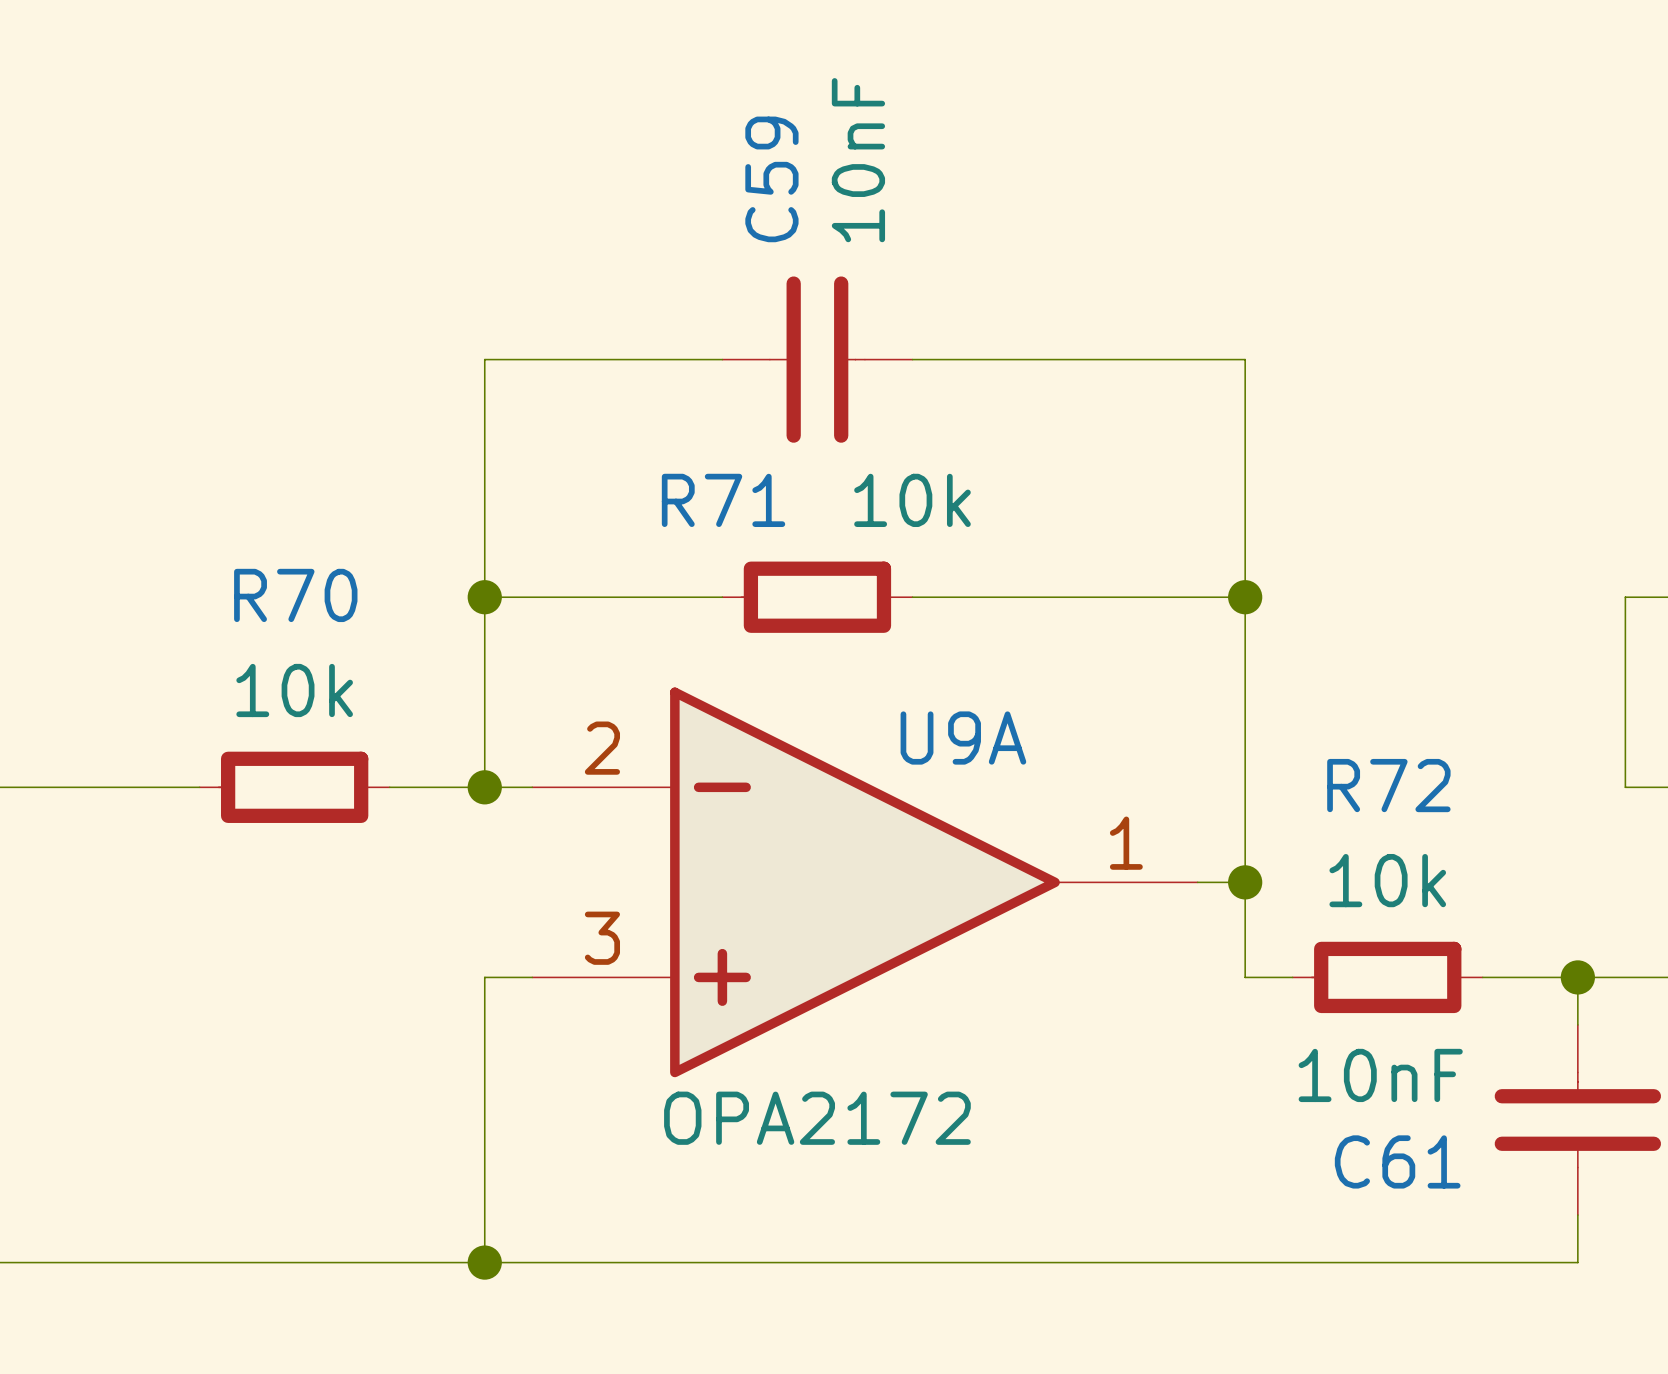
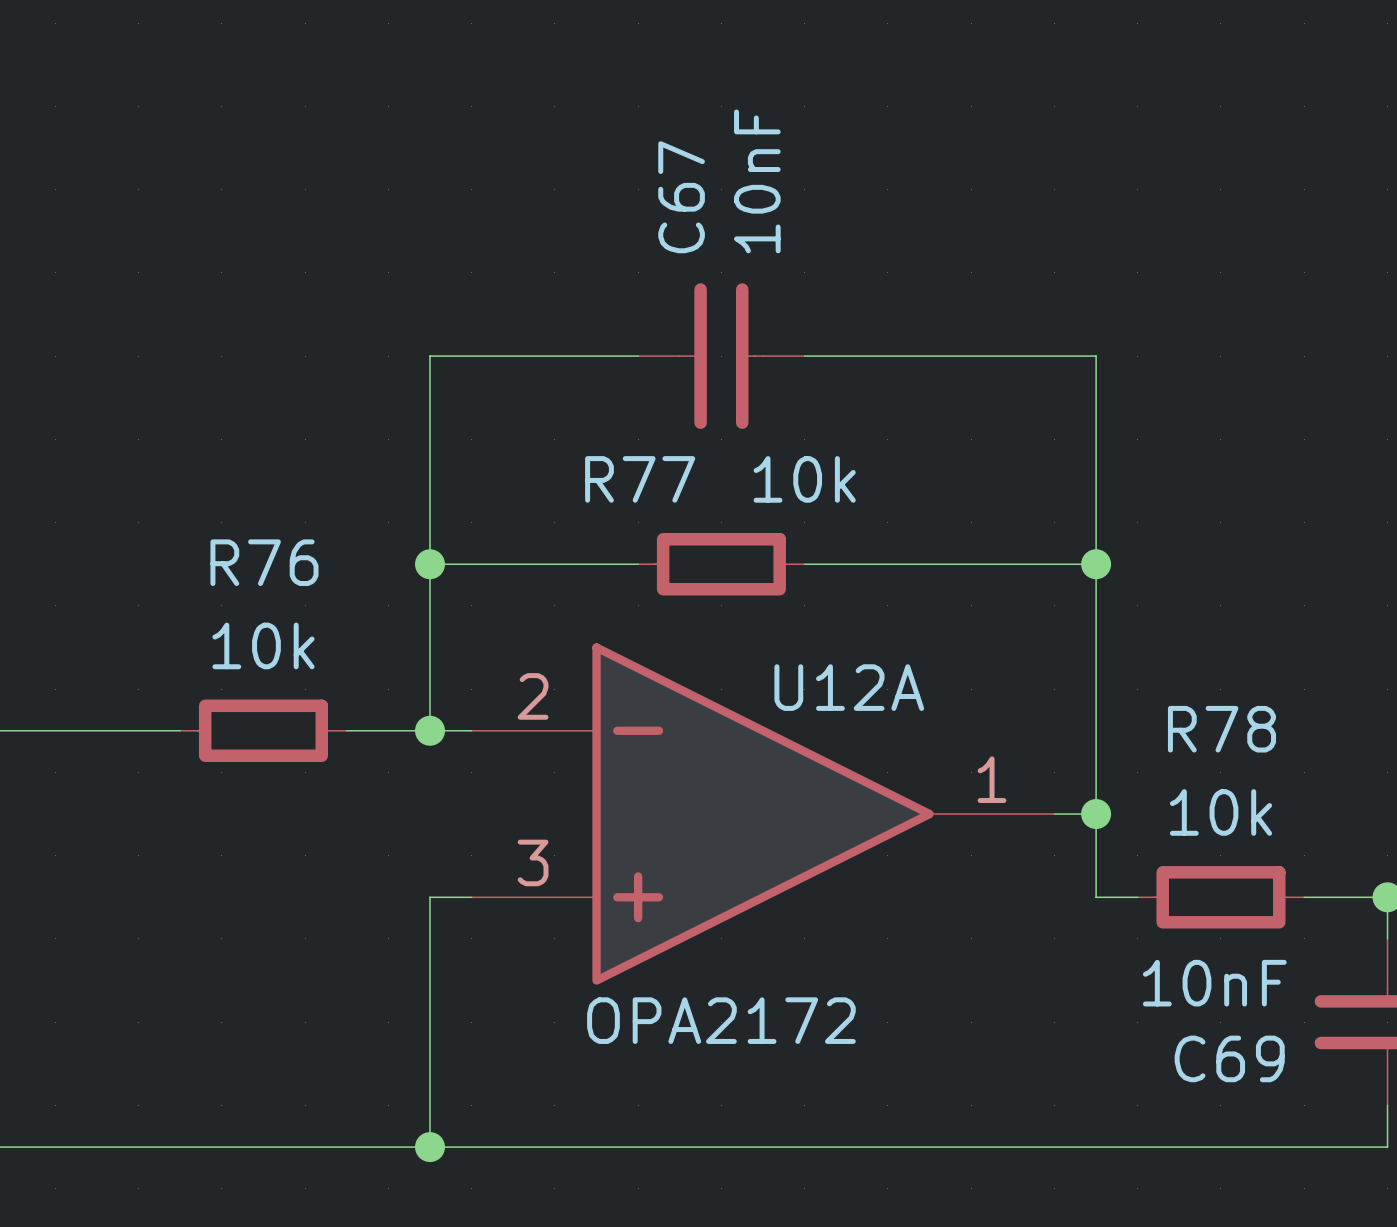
C59 name: C59 (771, 179) -> C67 (681, 197)
R71 name: R71 (723, 500) -> R77 (640, 479)
R70 name: R70 (295, 595) -> R76 (264, 562)
U9A name: U9A (963, 738) -> U12A (849, 687)
R72 name: R72 (1388, 785) -> R78 (1221, 729)
C61 name: C61 (1397, 1161) -> C69 (1229, 1058)

